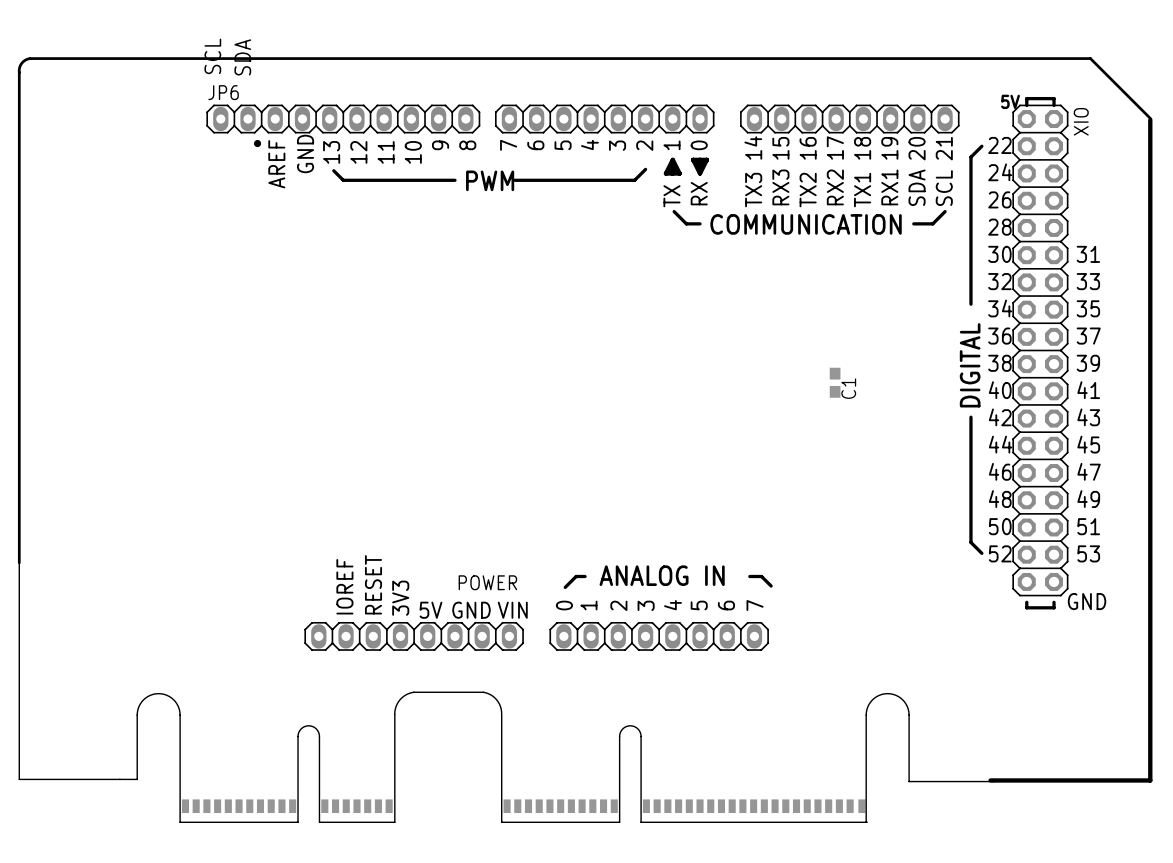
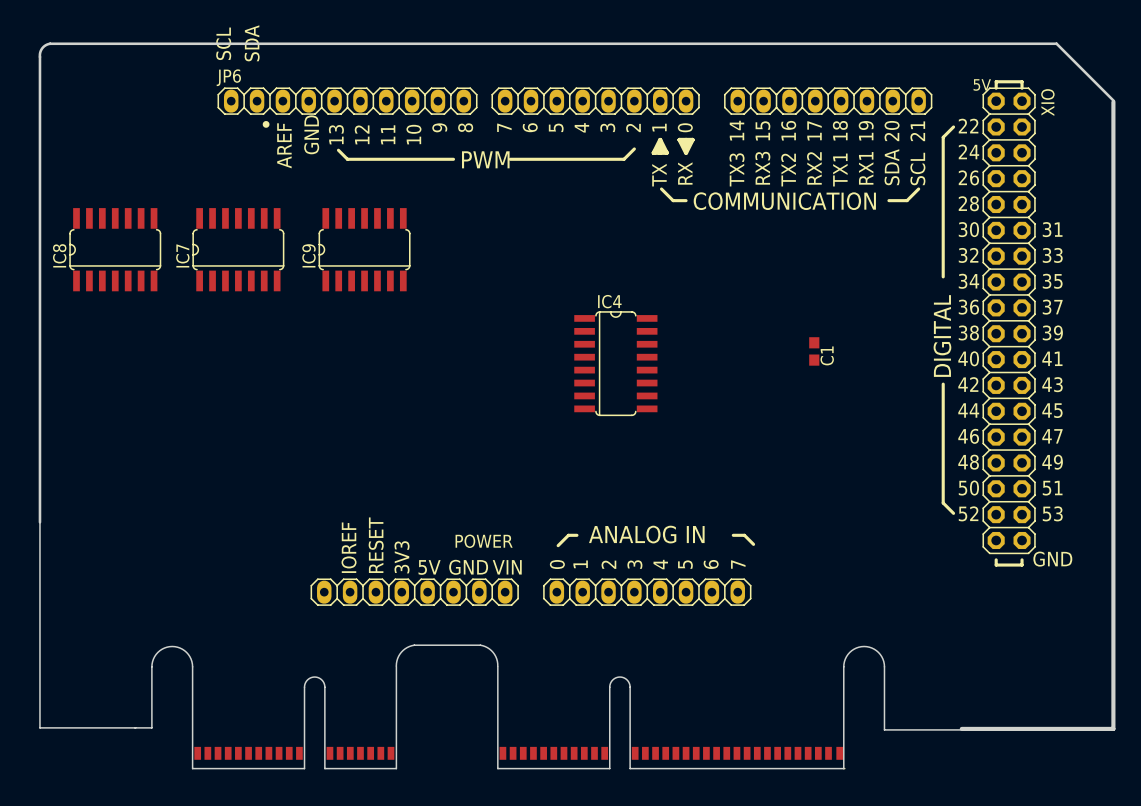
IC8: none -> (115, 249)
IC7: none -> (238, 249)
IC9: none -> (364, 249)
IC4: none -> (615, 363)

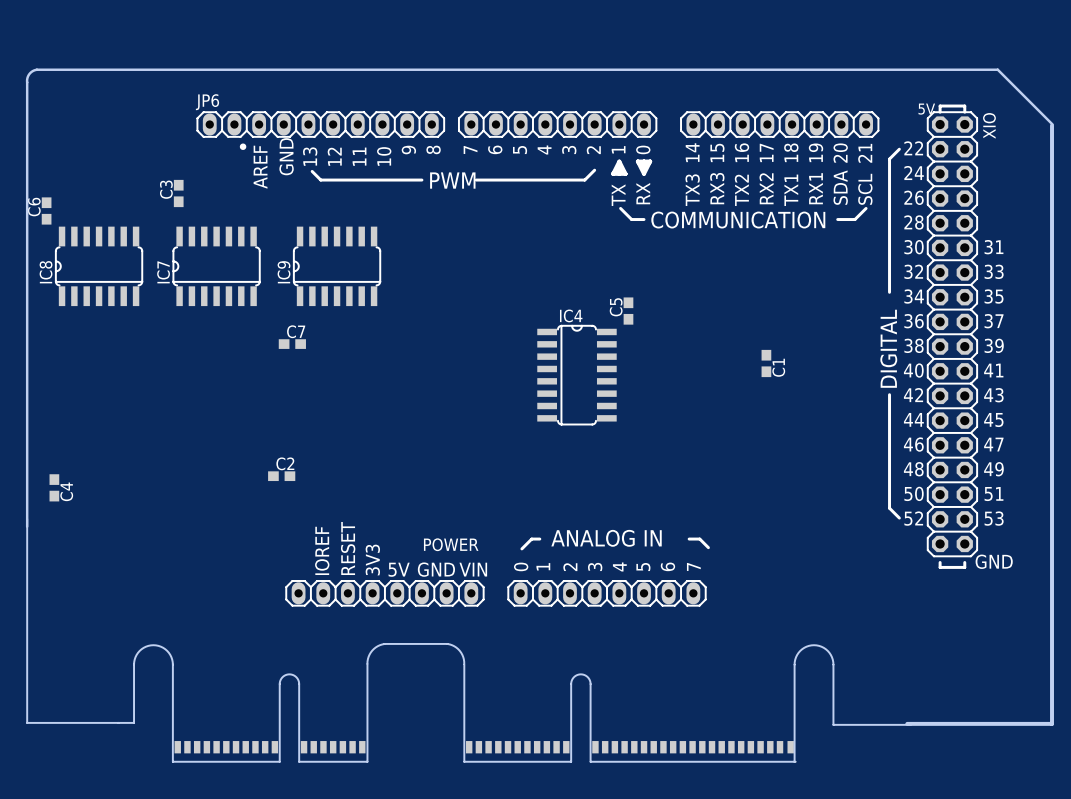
text: SCL (223, 43) -> none
text: SDA (252, 43) -> none
C3: none -> (178, 193)
C6: none -> (46, 210)
C5: none -> (628, 311)
C7: none -> (292, 344)
C2: none -> (281, 476)
C4: none -> (54, 487)

